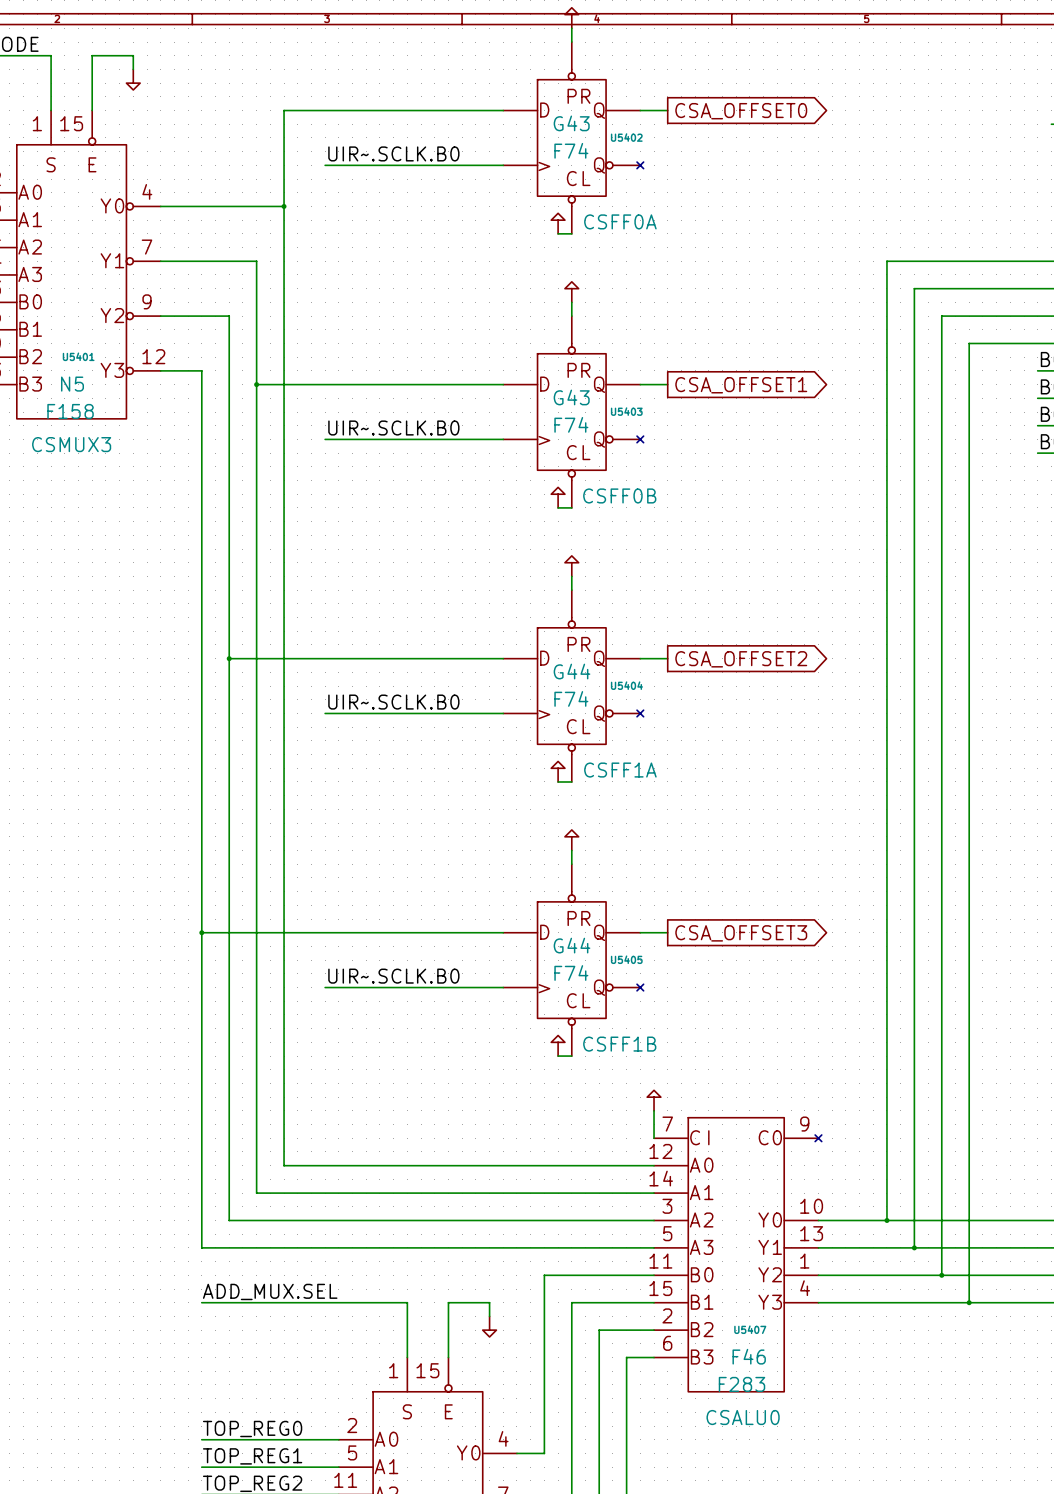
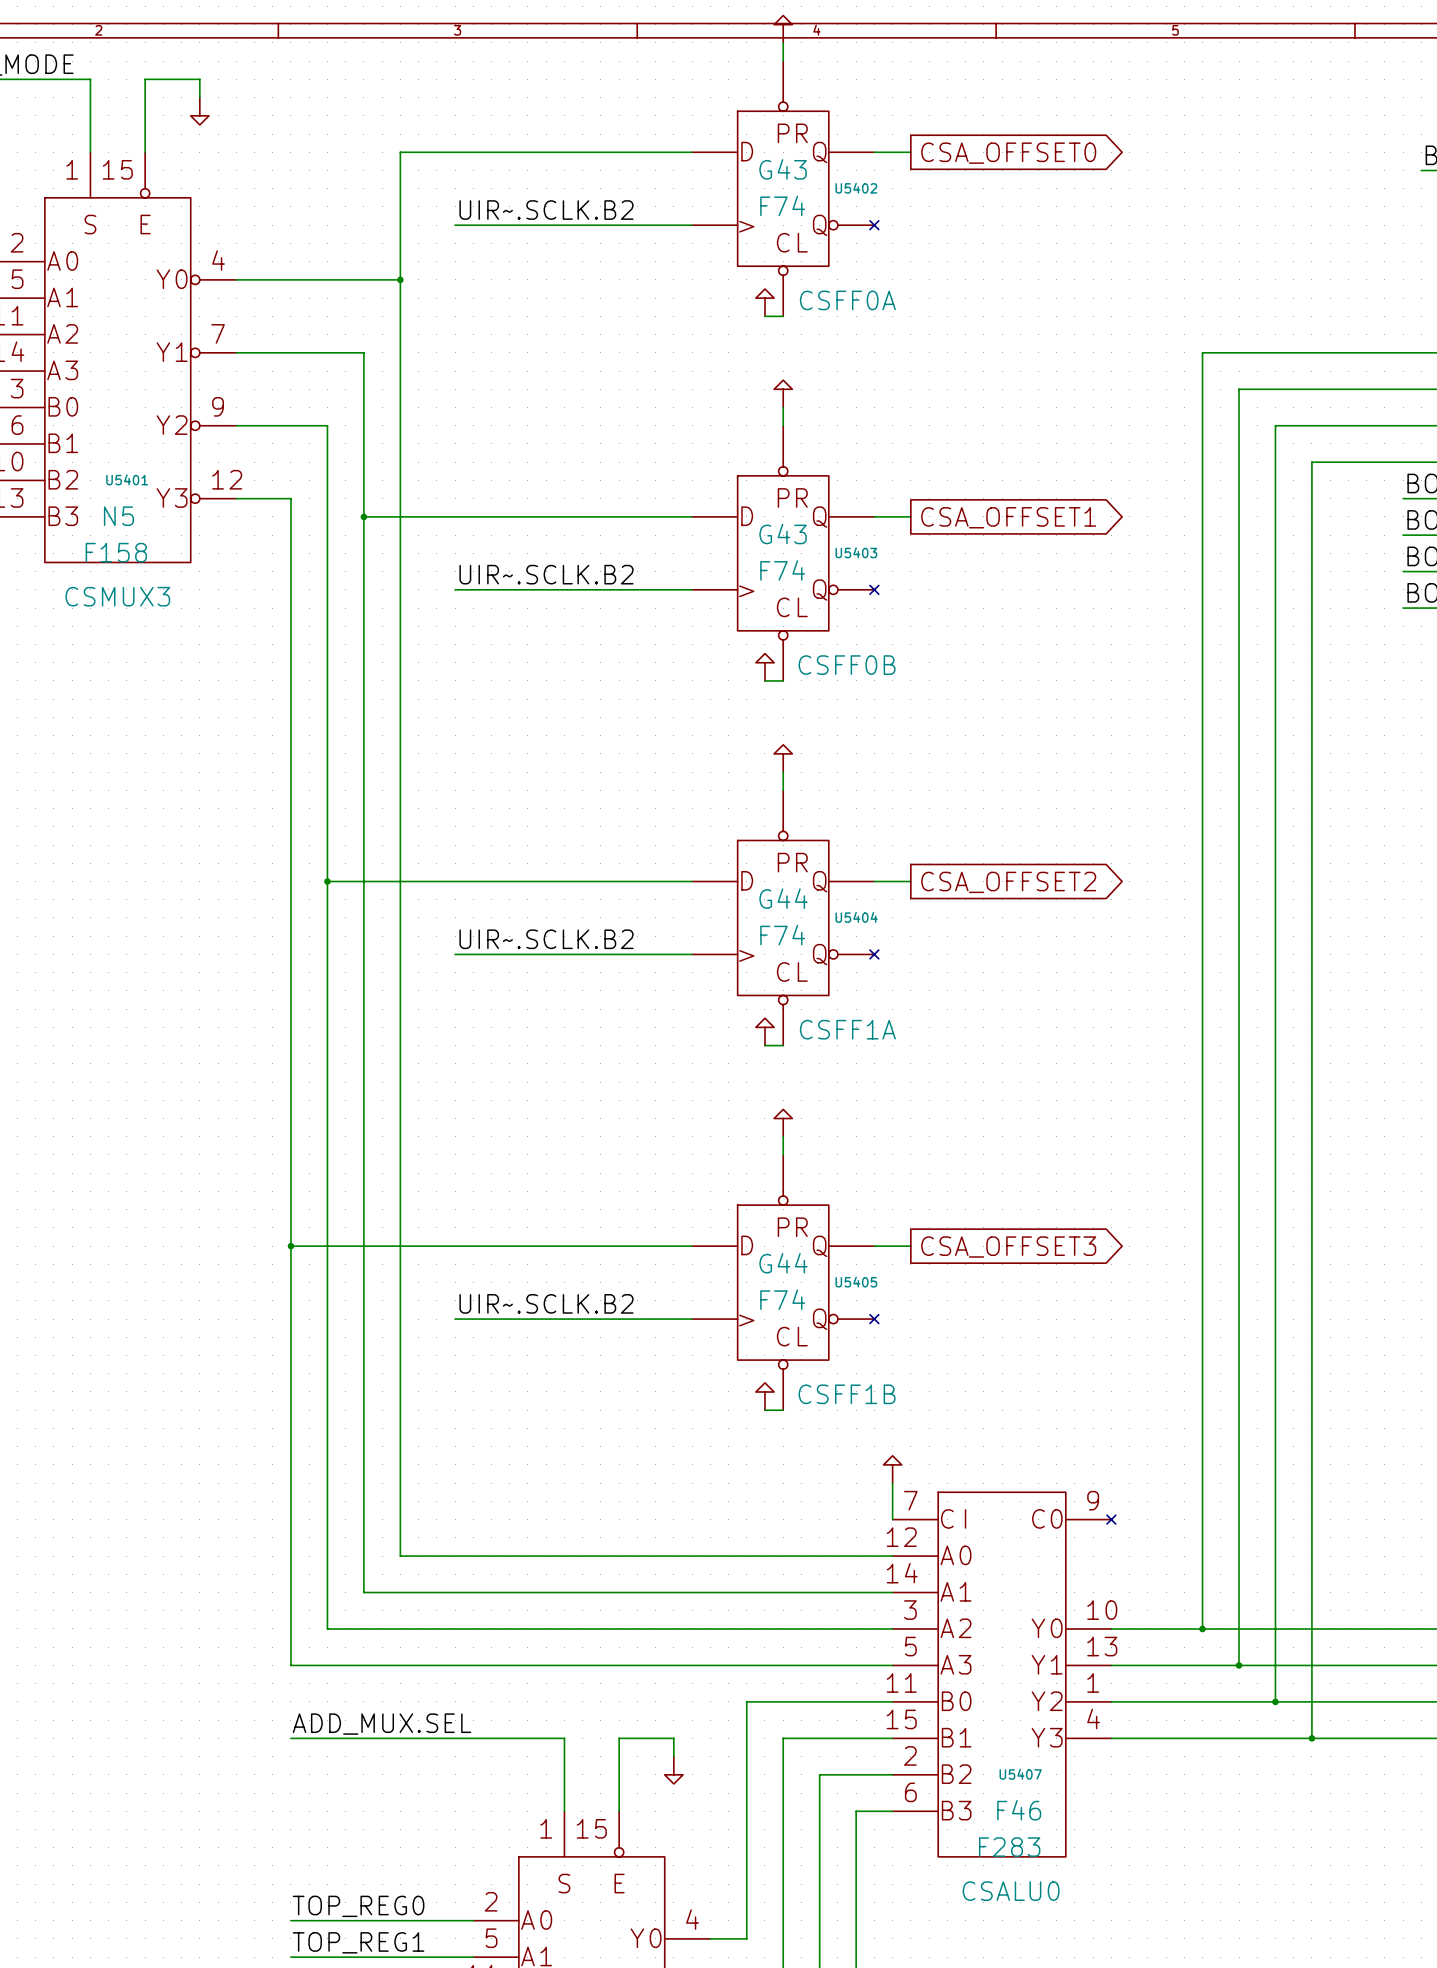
label: UIR~.SCLK.B0 (393, 153) -> UIR~.SCLK.B2 (546, 210)
label: UIR~.SCLK.B0 (393, 428) -> UIR~.SCLK.B2 (546, 574)
label: UIR~.SCLK.B0 (393, 702) -> UIR~.SCLK.B2 (546, 939)
label: UIR~.SCLK.B0 (393, 976) -> UIR~.SCLK.B2 (546, 1303)

